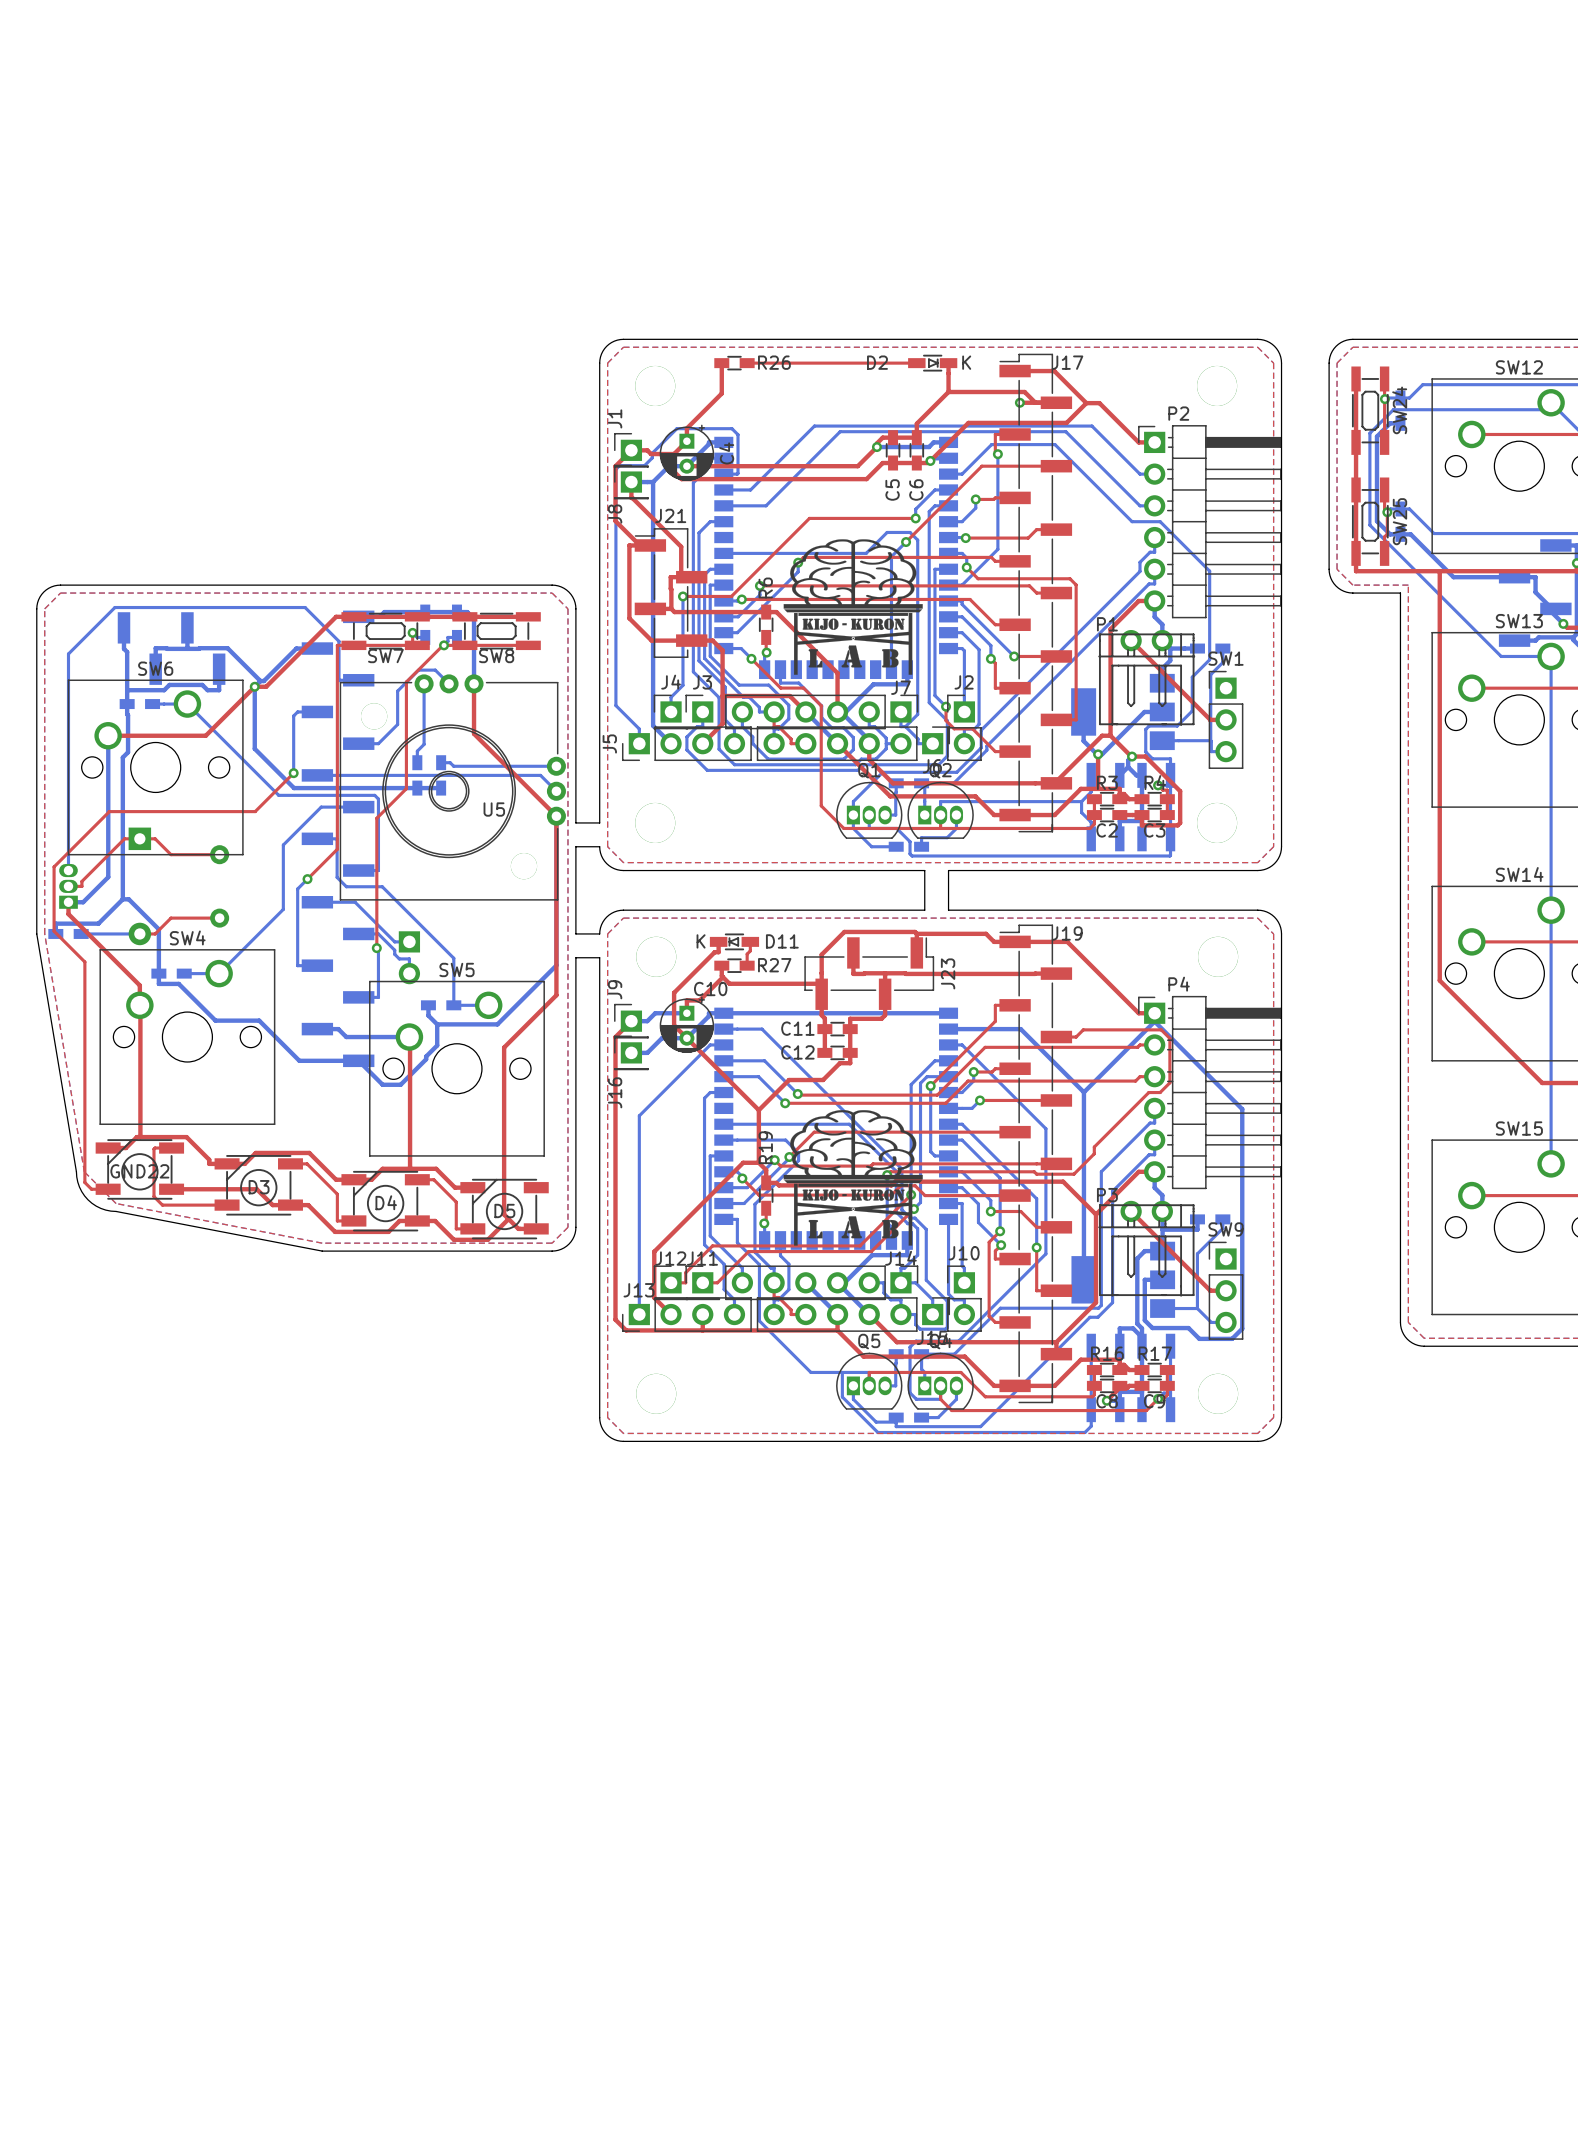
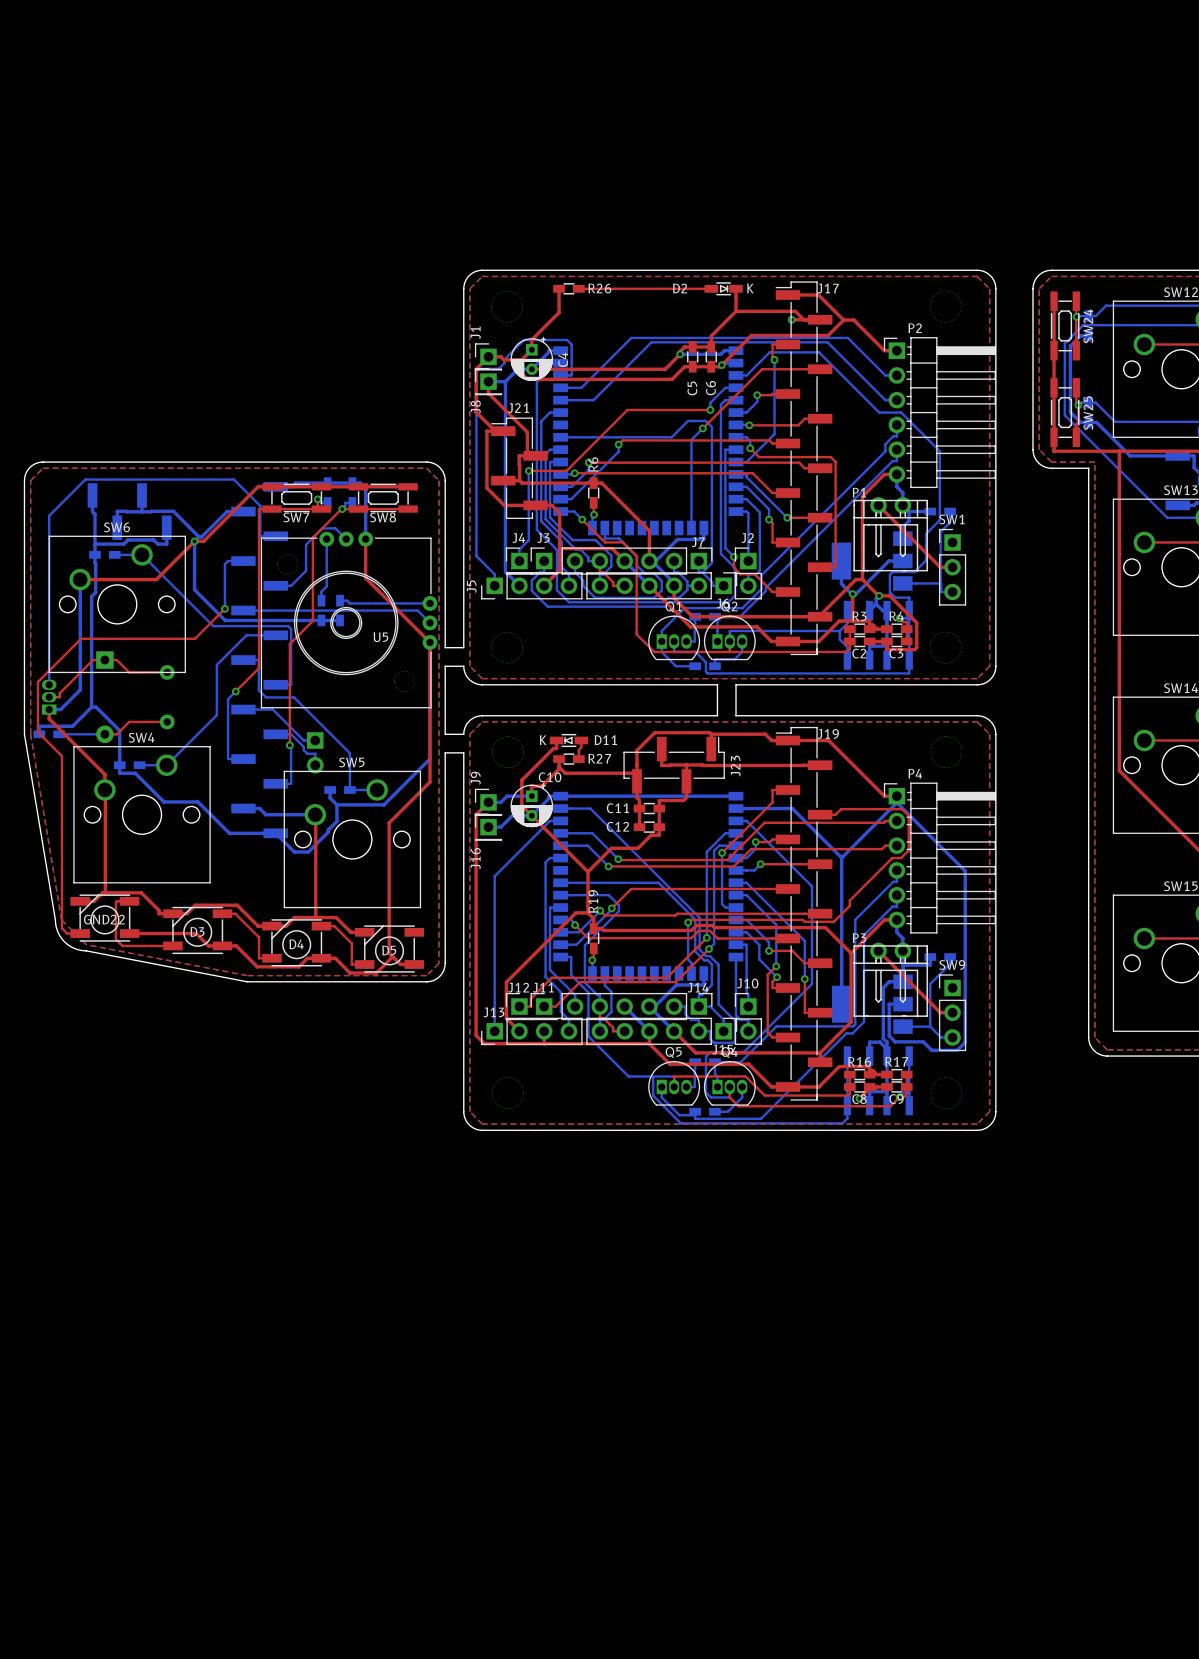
drawing: [783, 539, 923, 675] -> none
drawing: [783, 1110, 923, 1246] -> none

